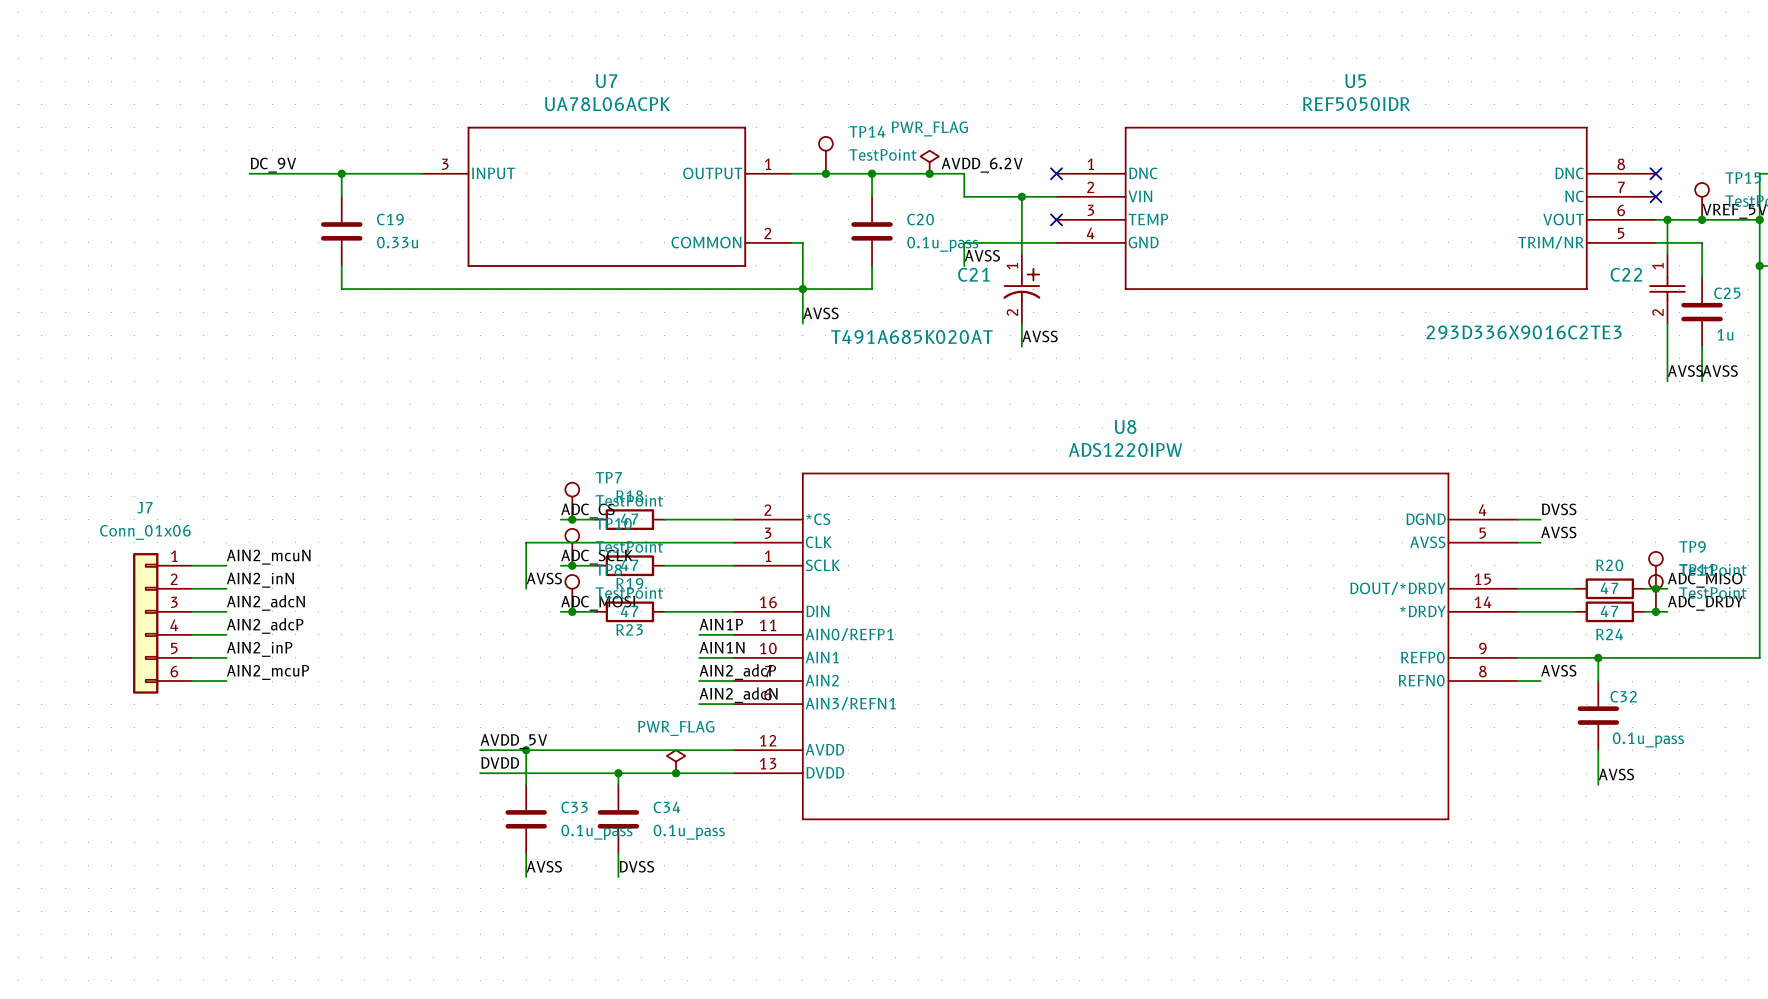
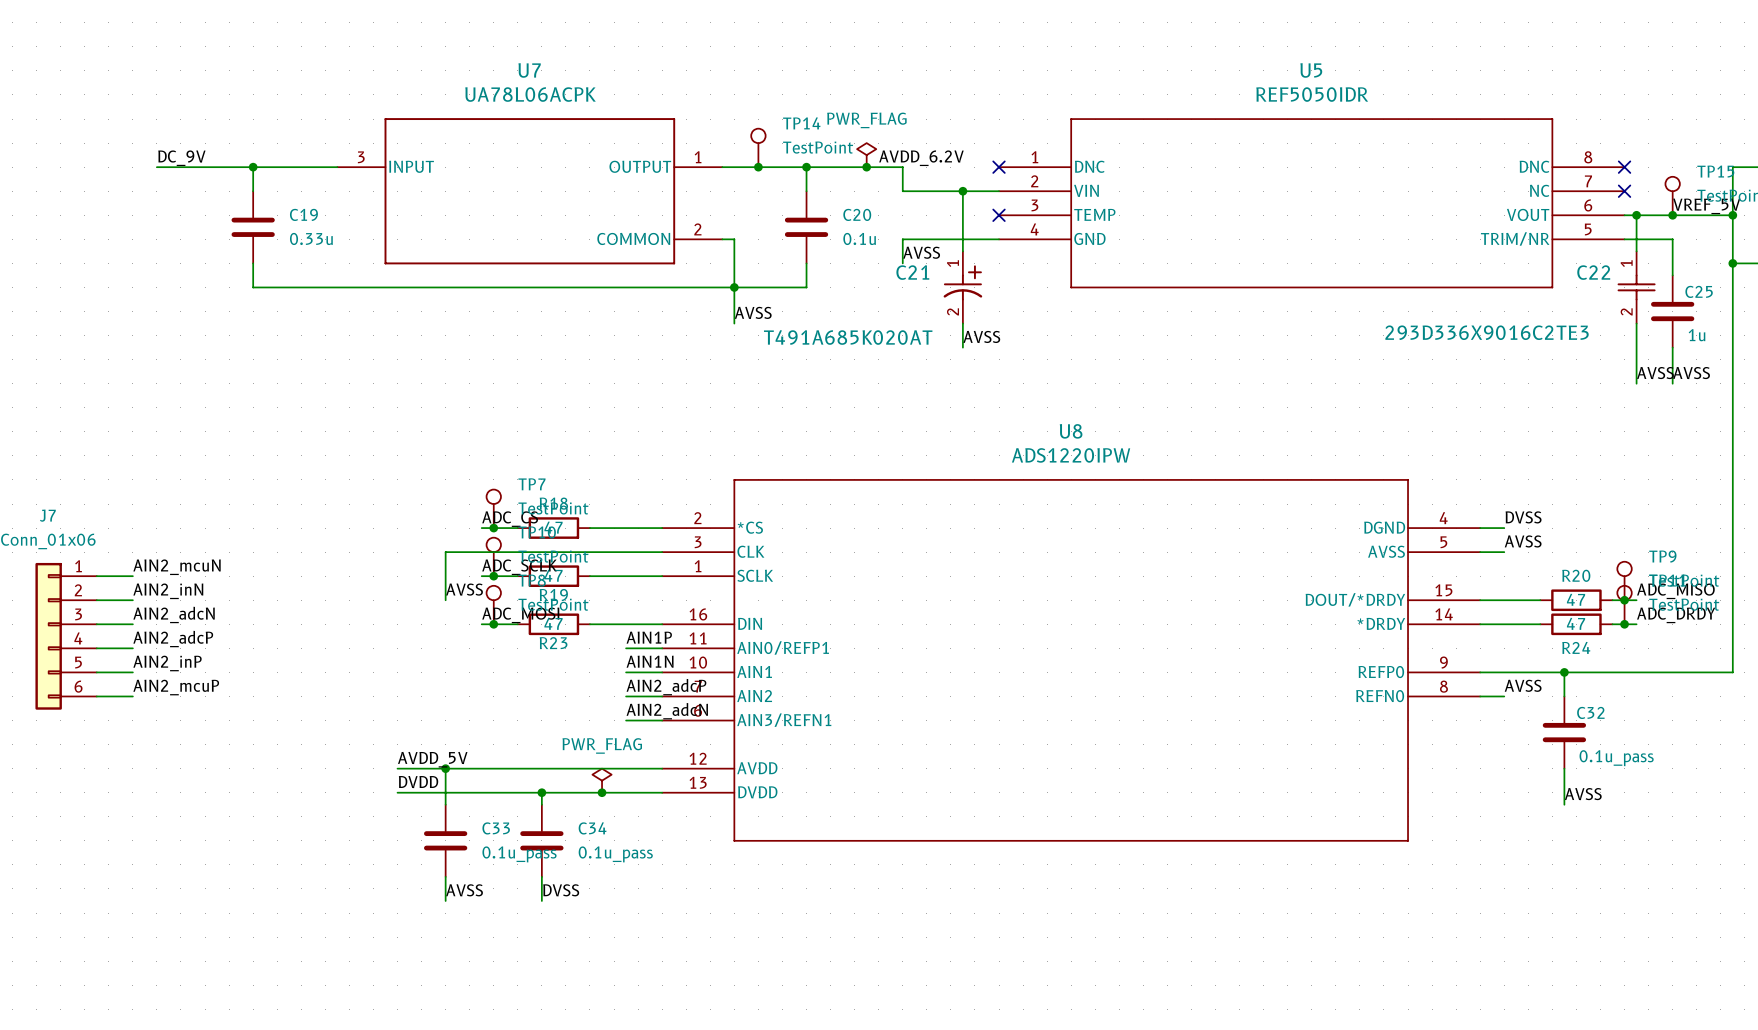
C20 value: 0.1u_pass (942, 244) -> 0.1u (859, 238)

